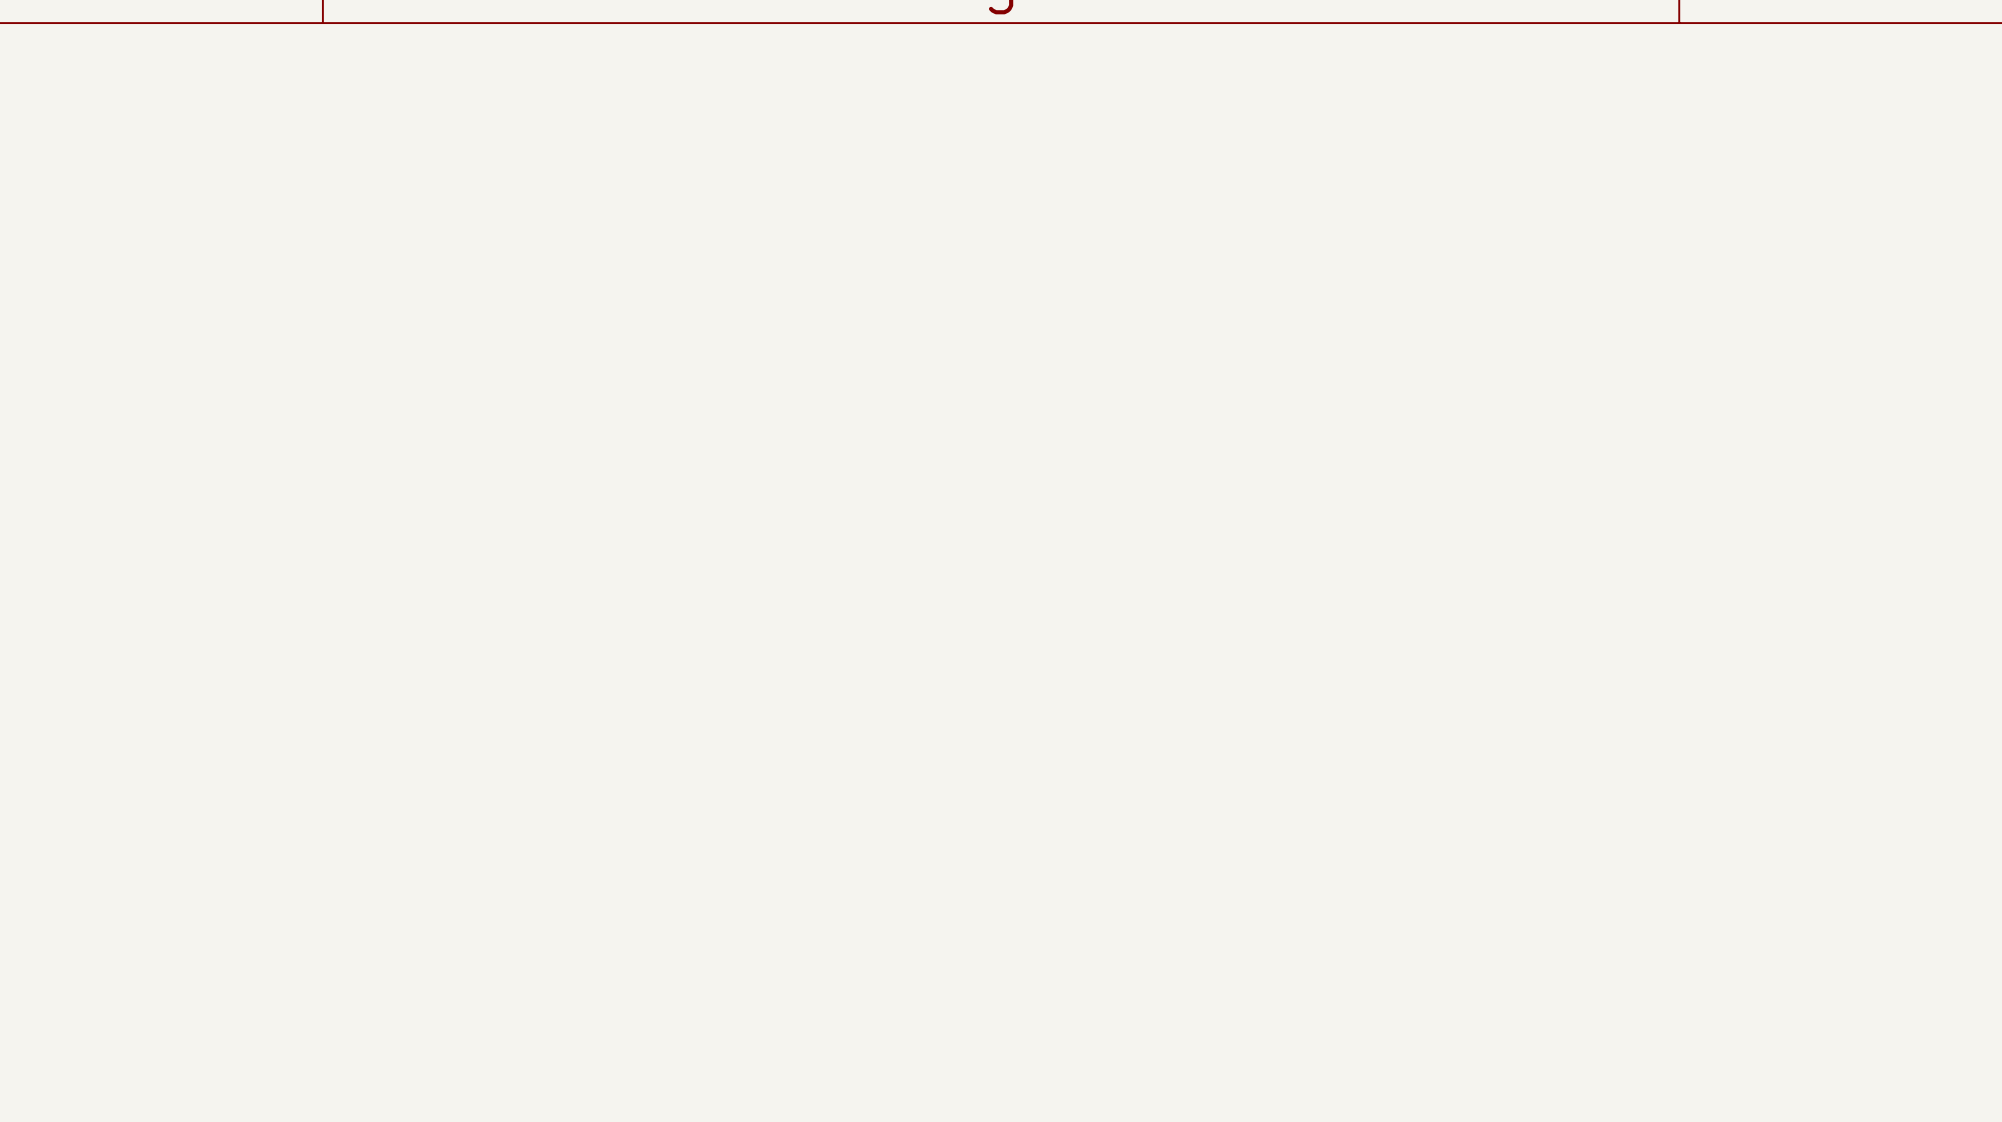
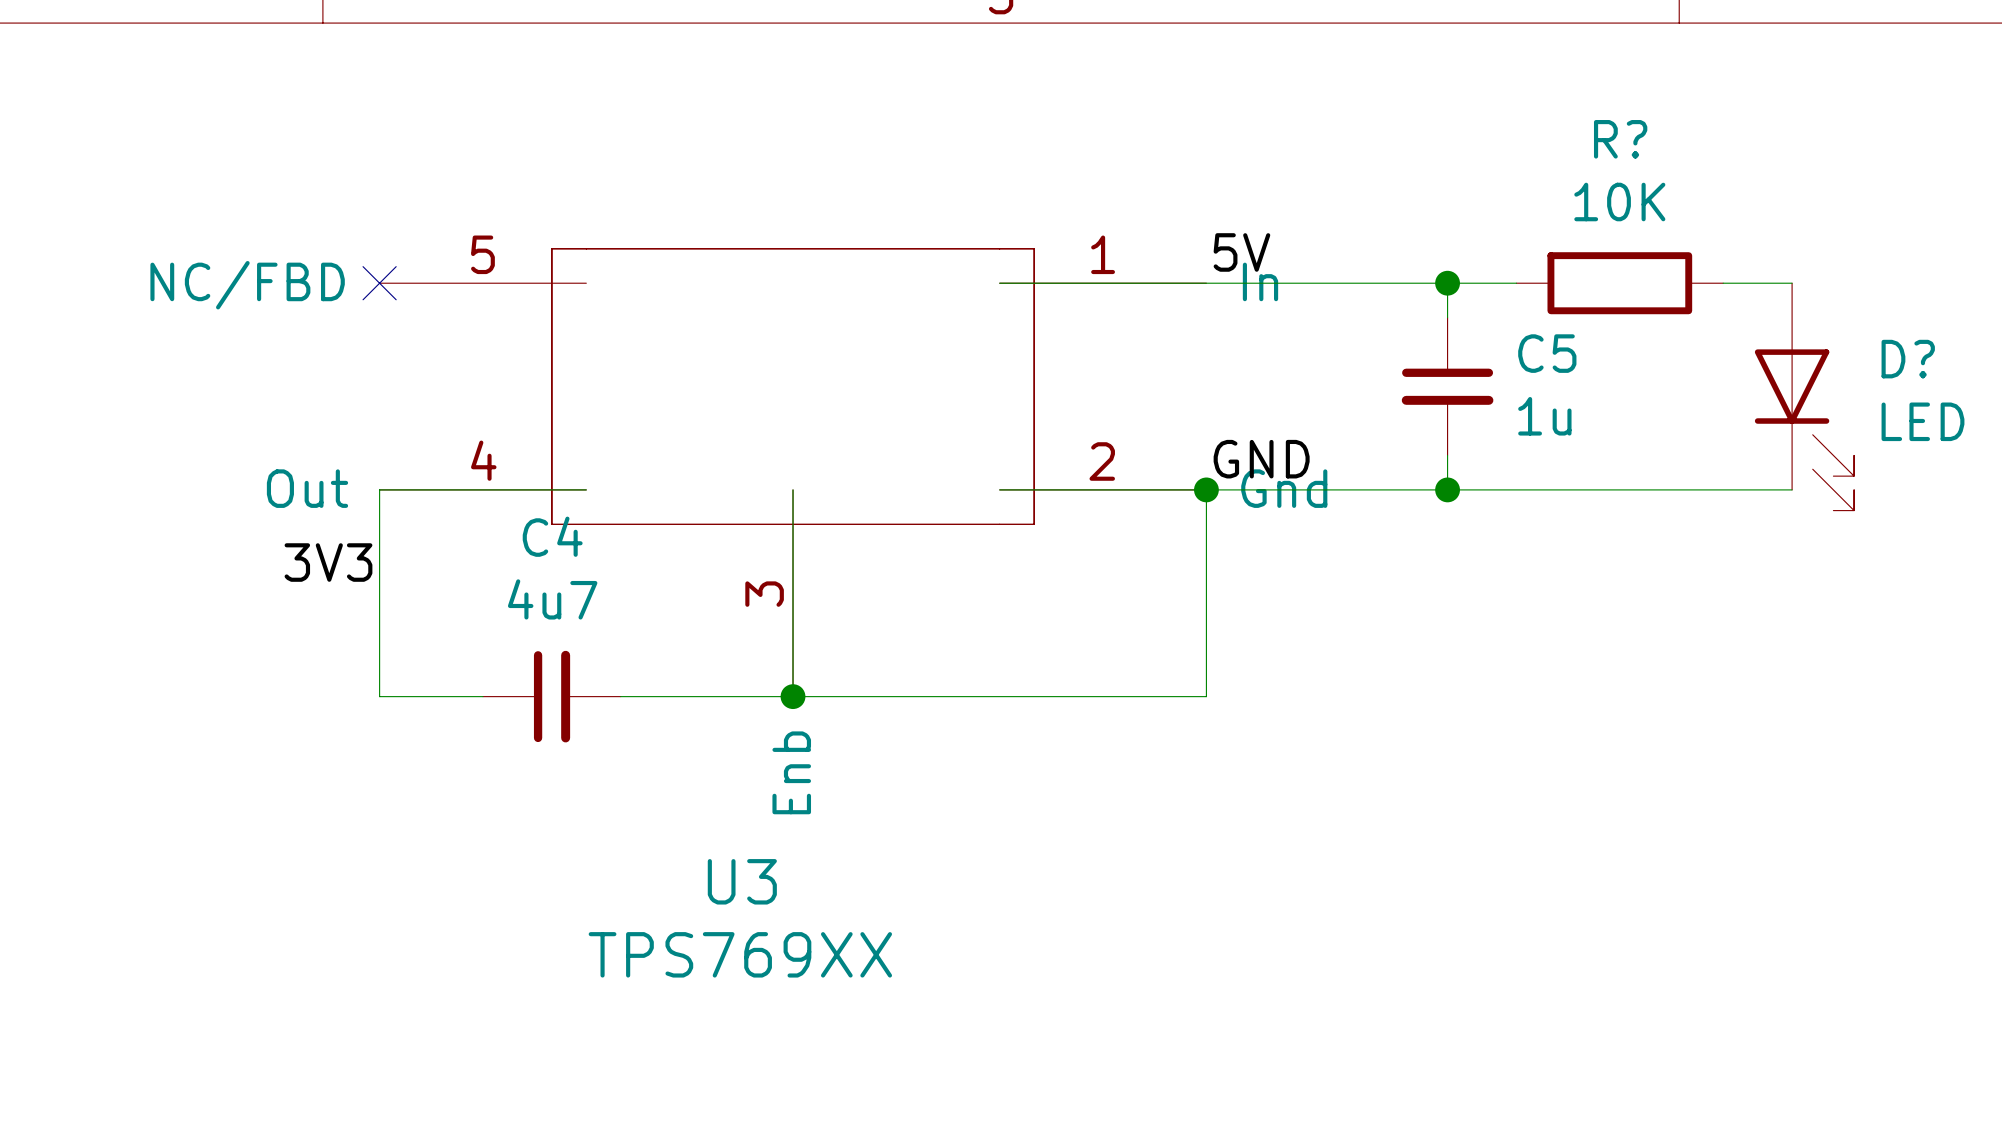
label: none -> 5V (1241, 252)
no-connect mark: none -> (379, 283)
wire: none -> (999, 283) (1516, 283)
wire: none -> (1447, 283) (1447, 317)
junction: none -> (1447, 283)
R?: none -> 10K (1619, 283)
wire: none -> (1723, 283) (1792, 283)
C5: none -> 1u (1447, 386)
D?: none -> LED (1804, 396)
wire: none -> (1447, 455) (1447, 489)
label: none -> GND (1261, 459)
U3: none -> TPS769XX (793, 472)
wire: none -> (586, 489) (379, 489) (379, 696) (482, 696)
wire: none -> (793, 489) (793, 696)
wire: none -> (999, 489) (1792, 489)
wire: none -> (1206, 489) (1206, 696) (620, 696)
junction: none -> (1206, 489)
junction: none -> (1447, 489)
label: none -> 3V3 (328, 562)
C4: none -> 4u7 (551, 696)
junction: none -> (793, 696)

